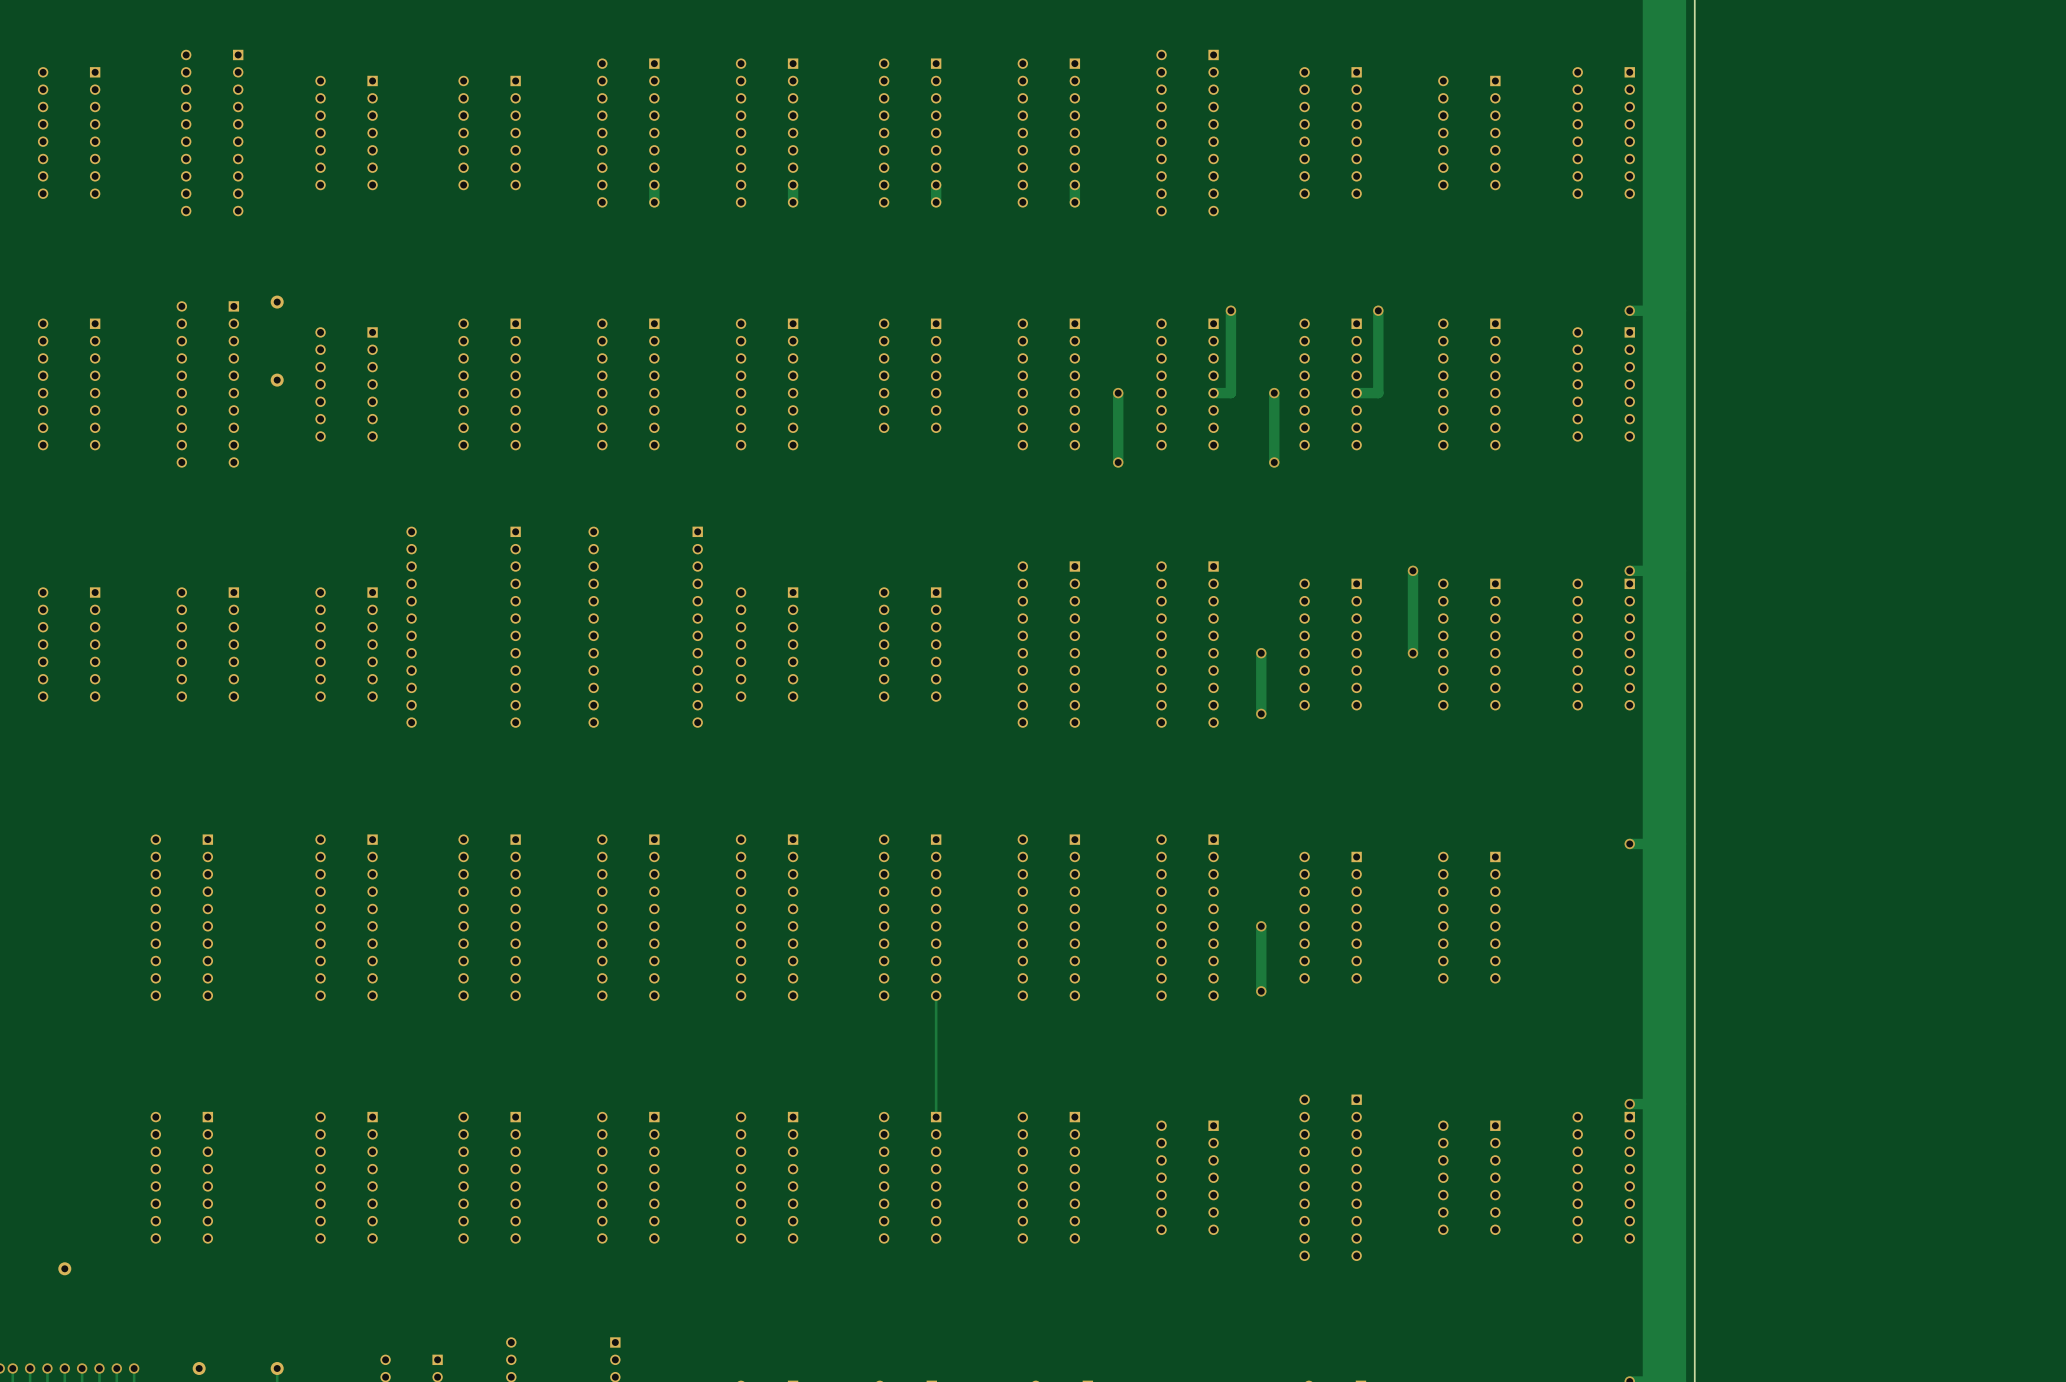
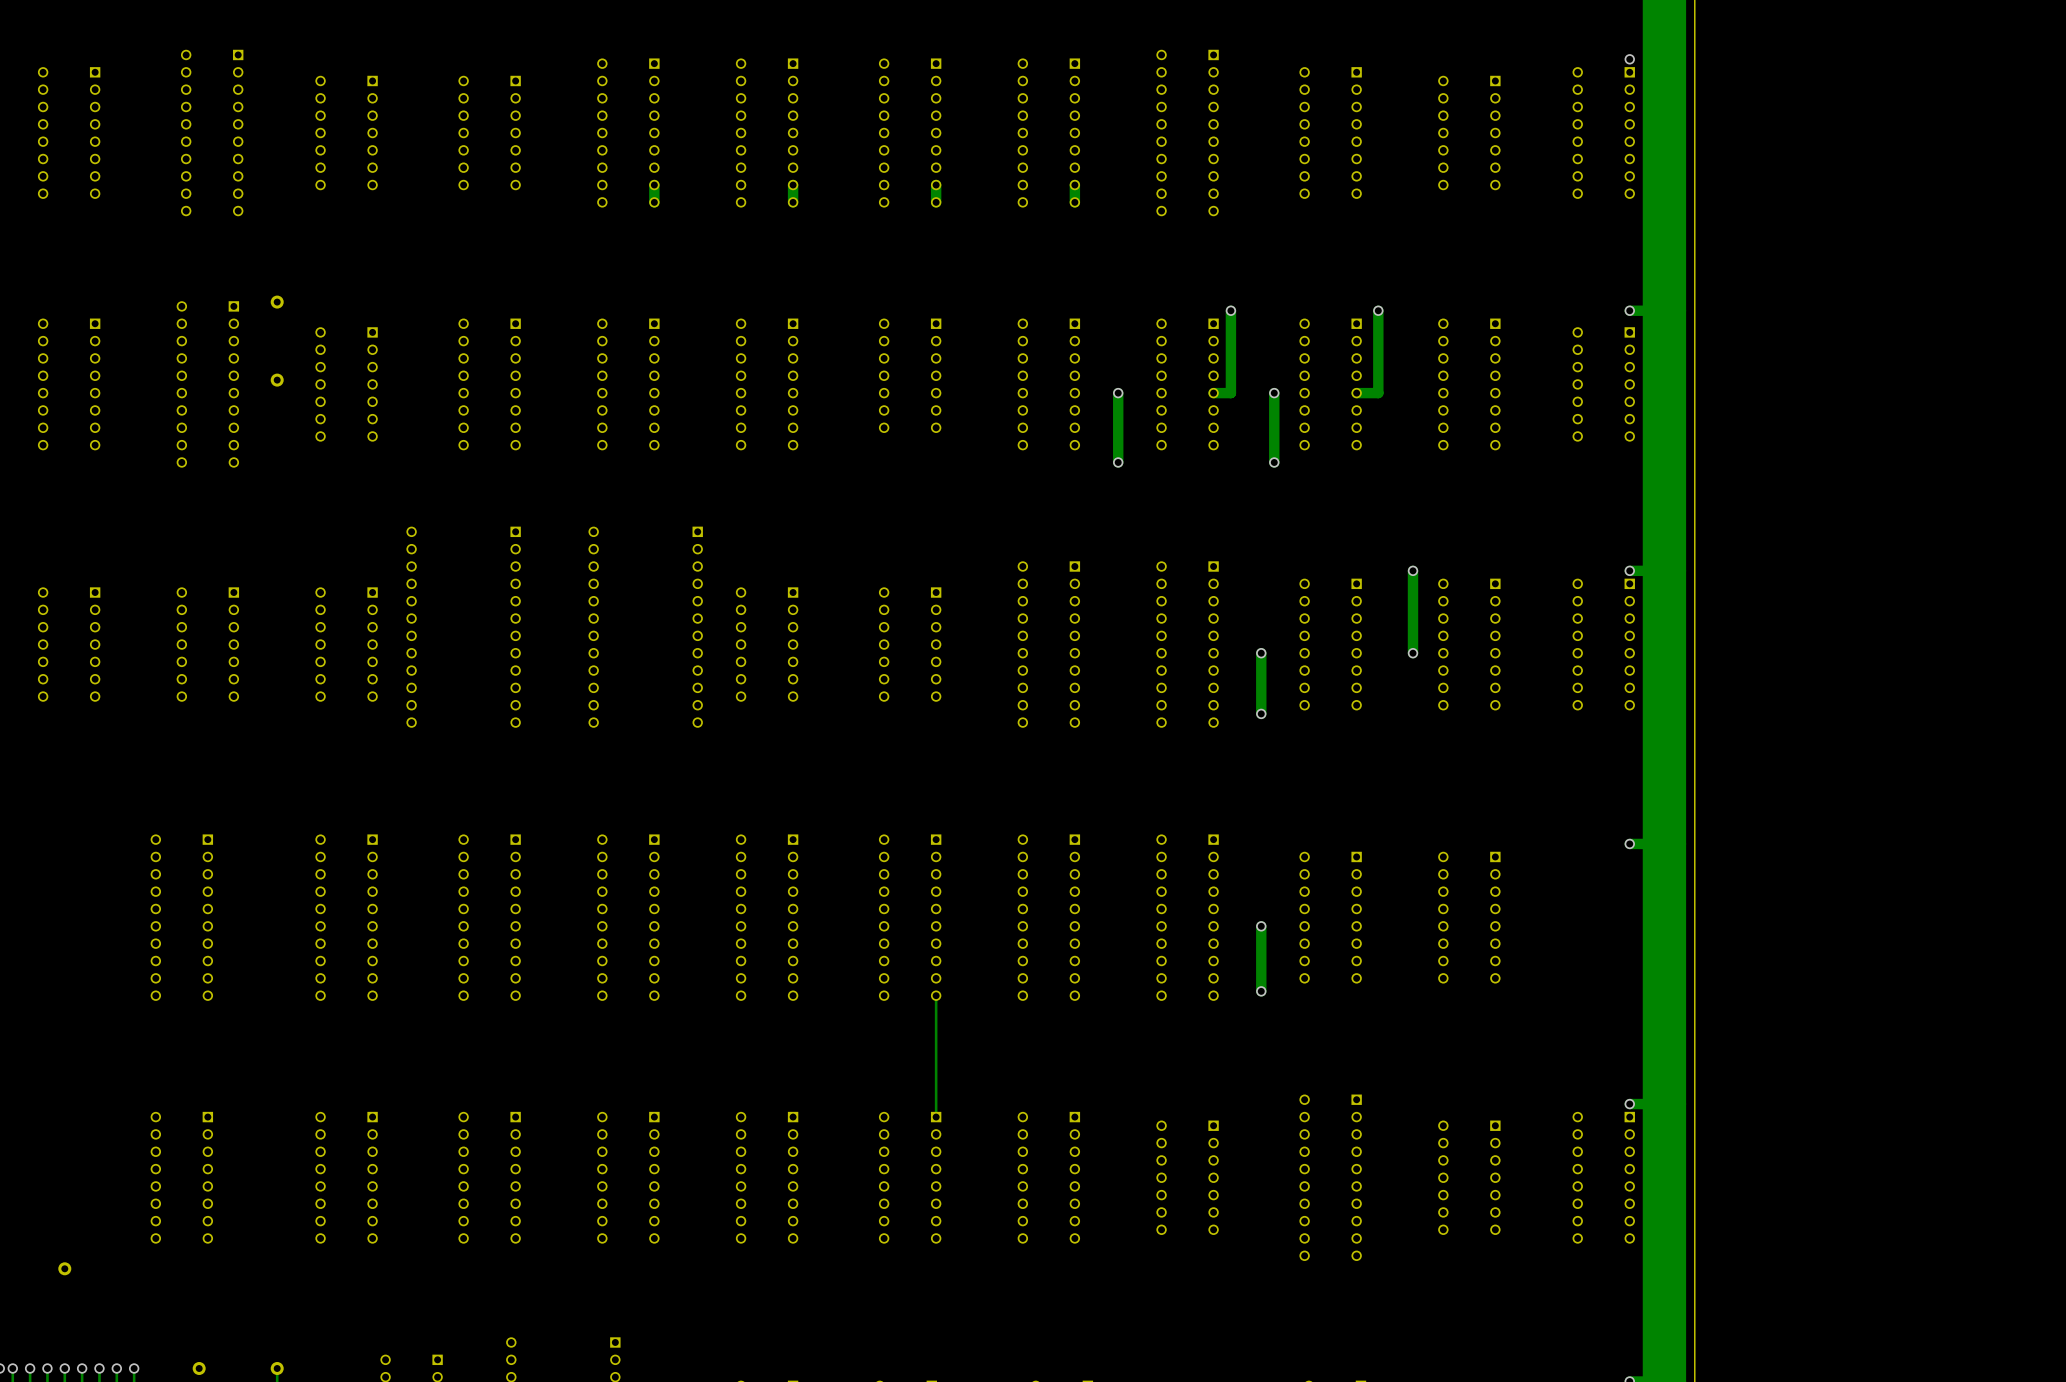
via: none -> (1629, 59)

